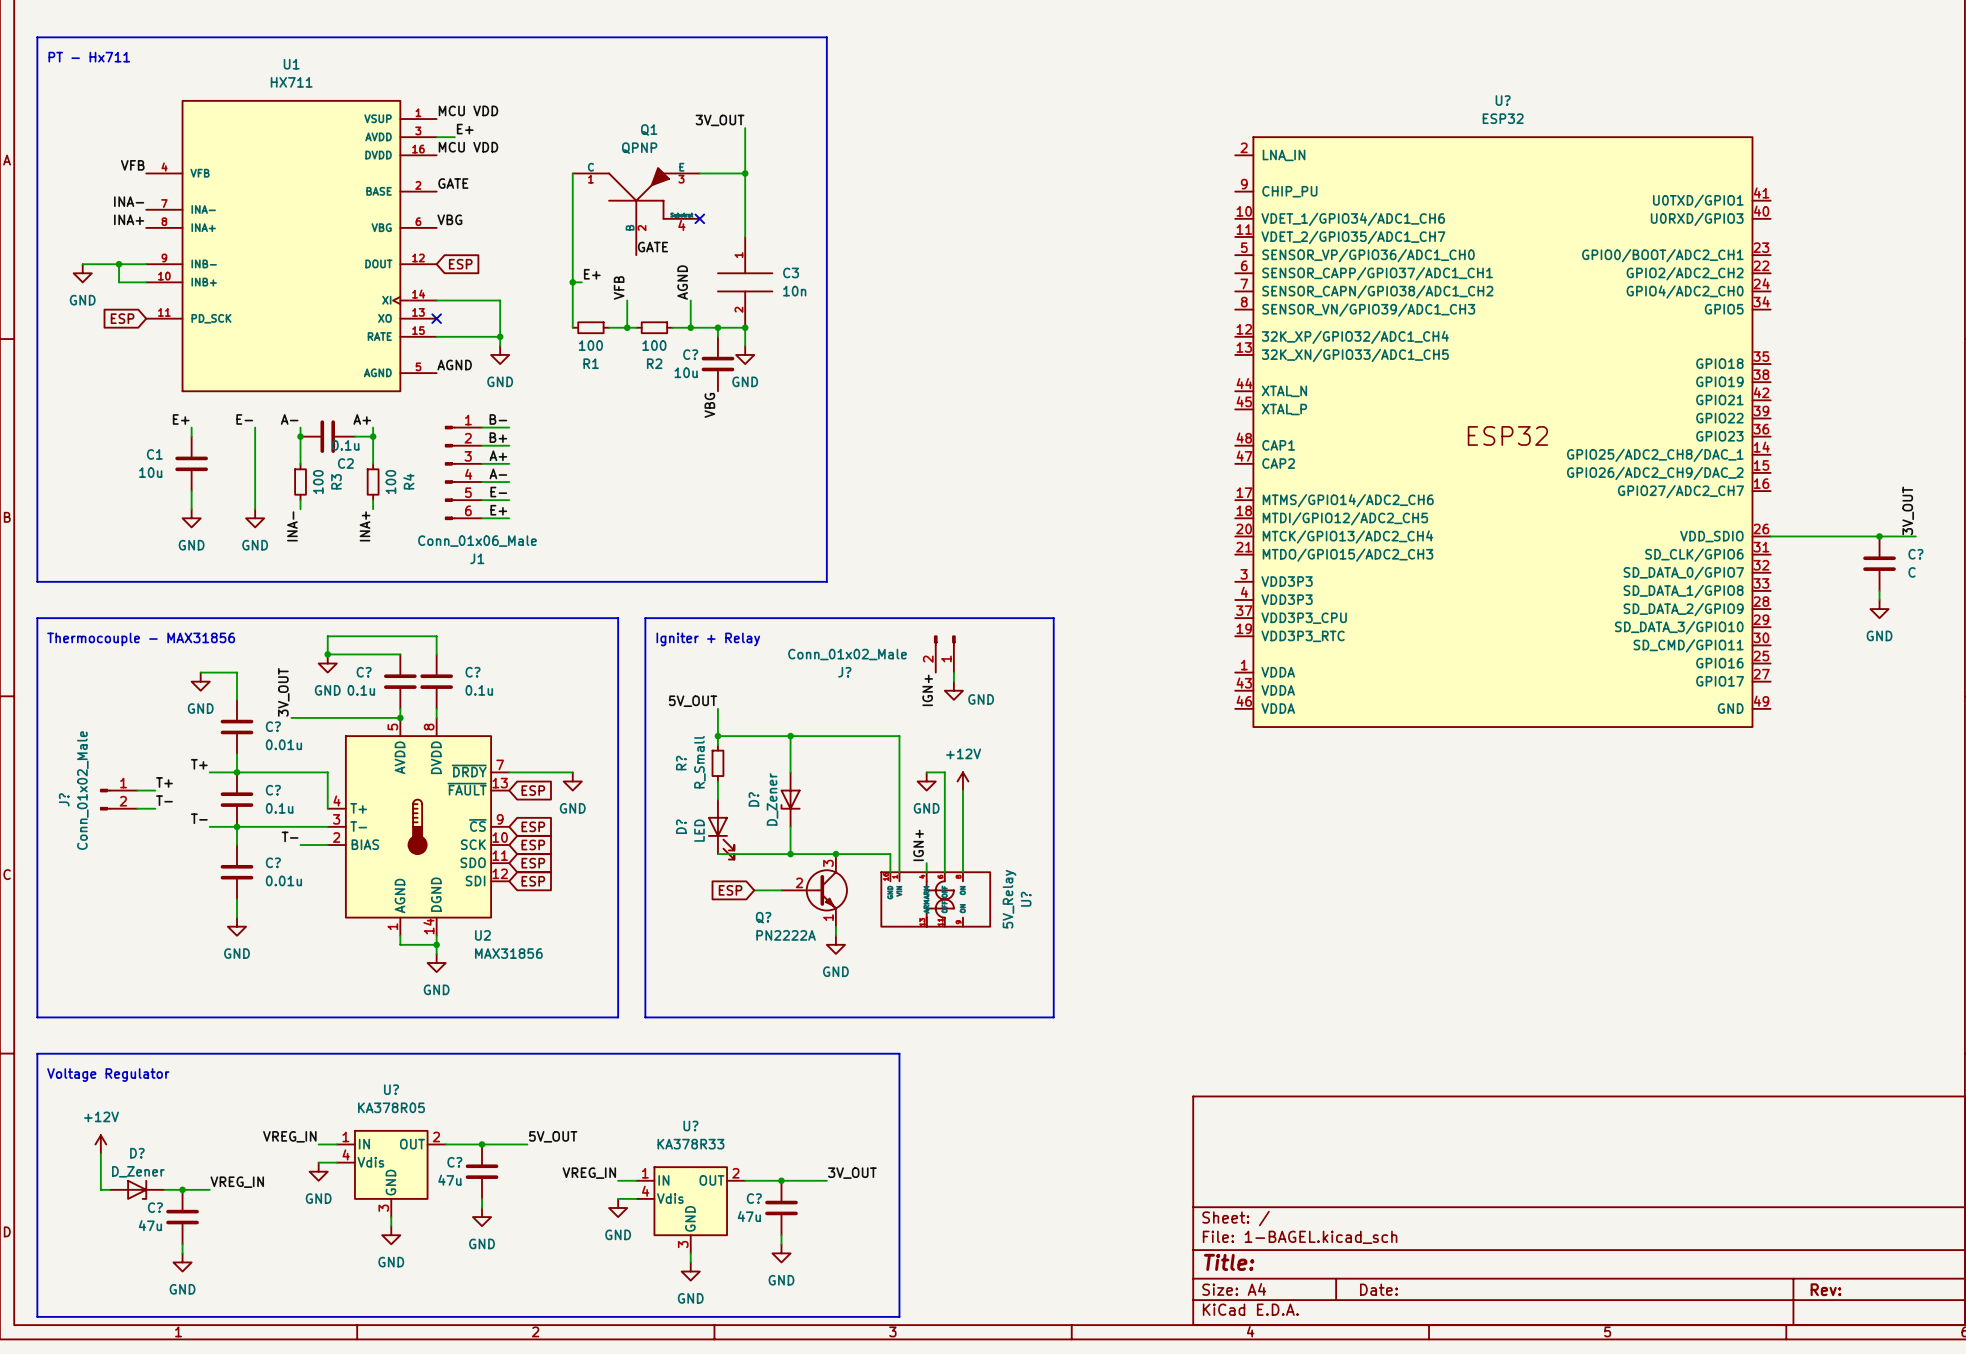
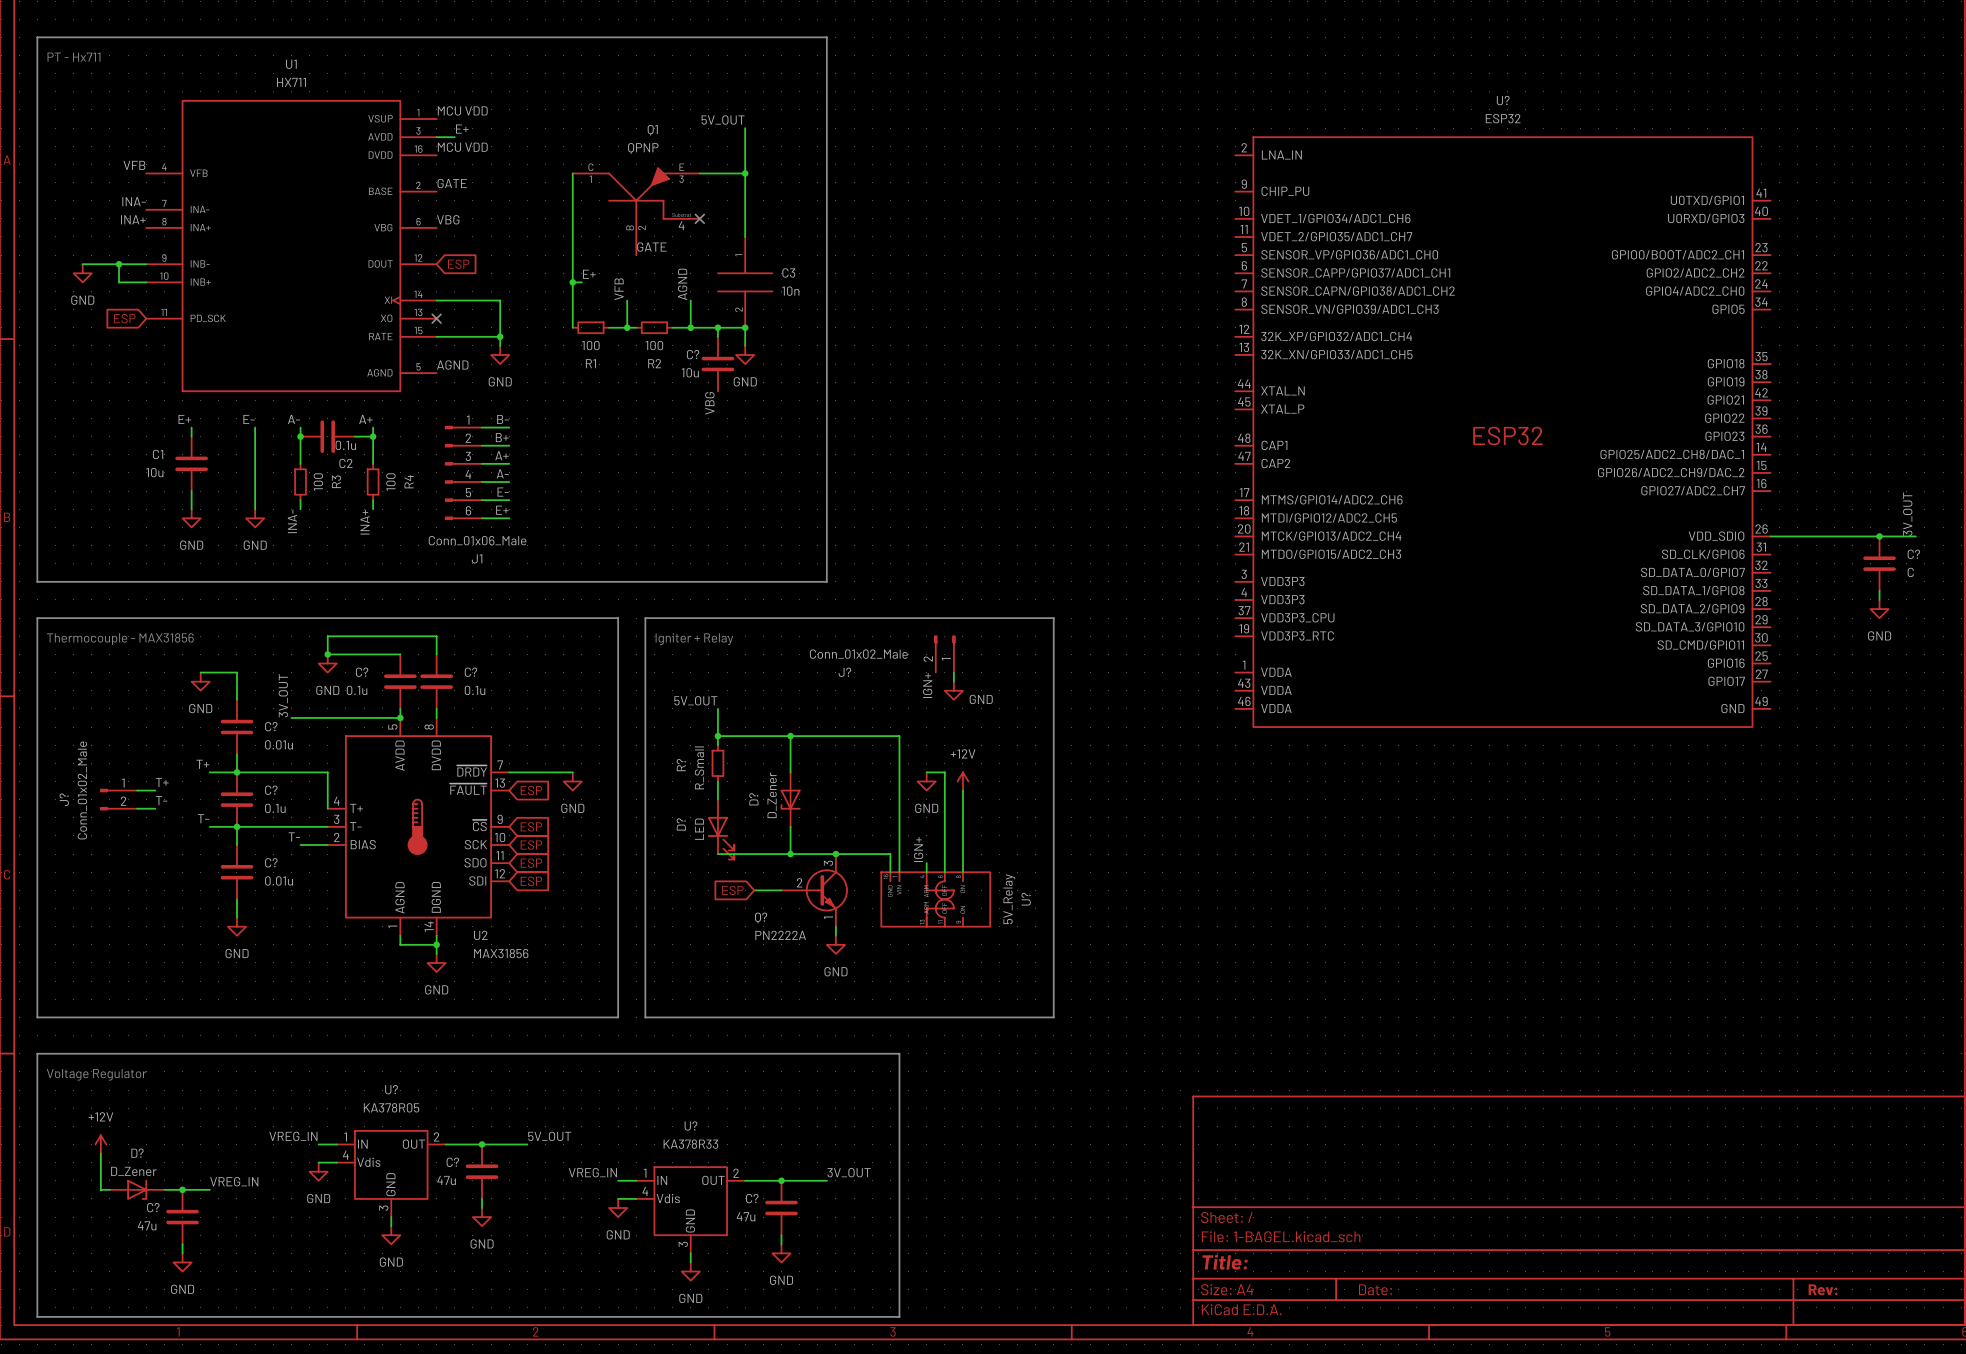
label: 3V_OUT (720, 120) -> 5V_OUT (723, 120)

